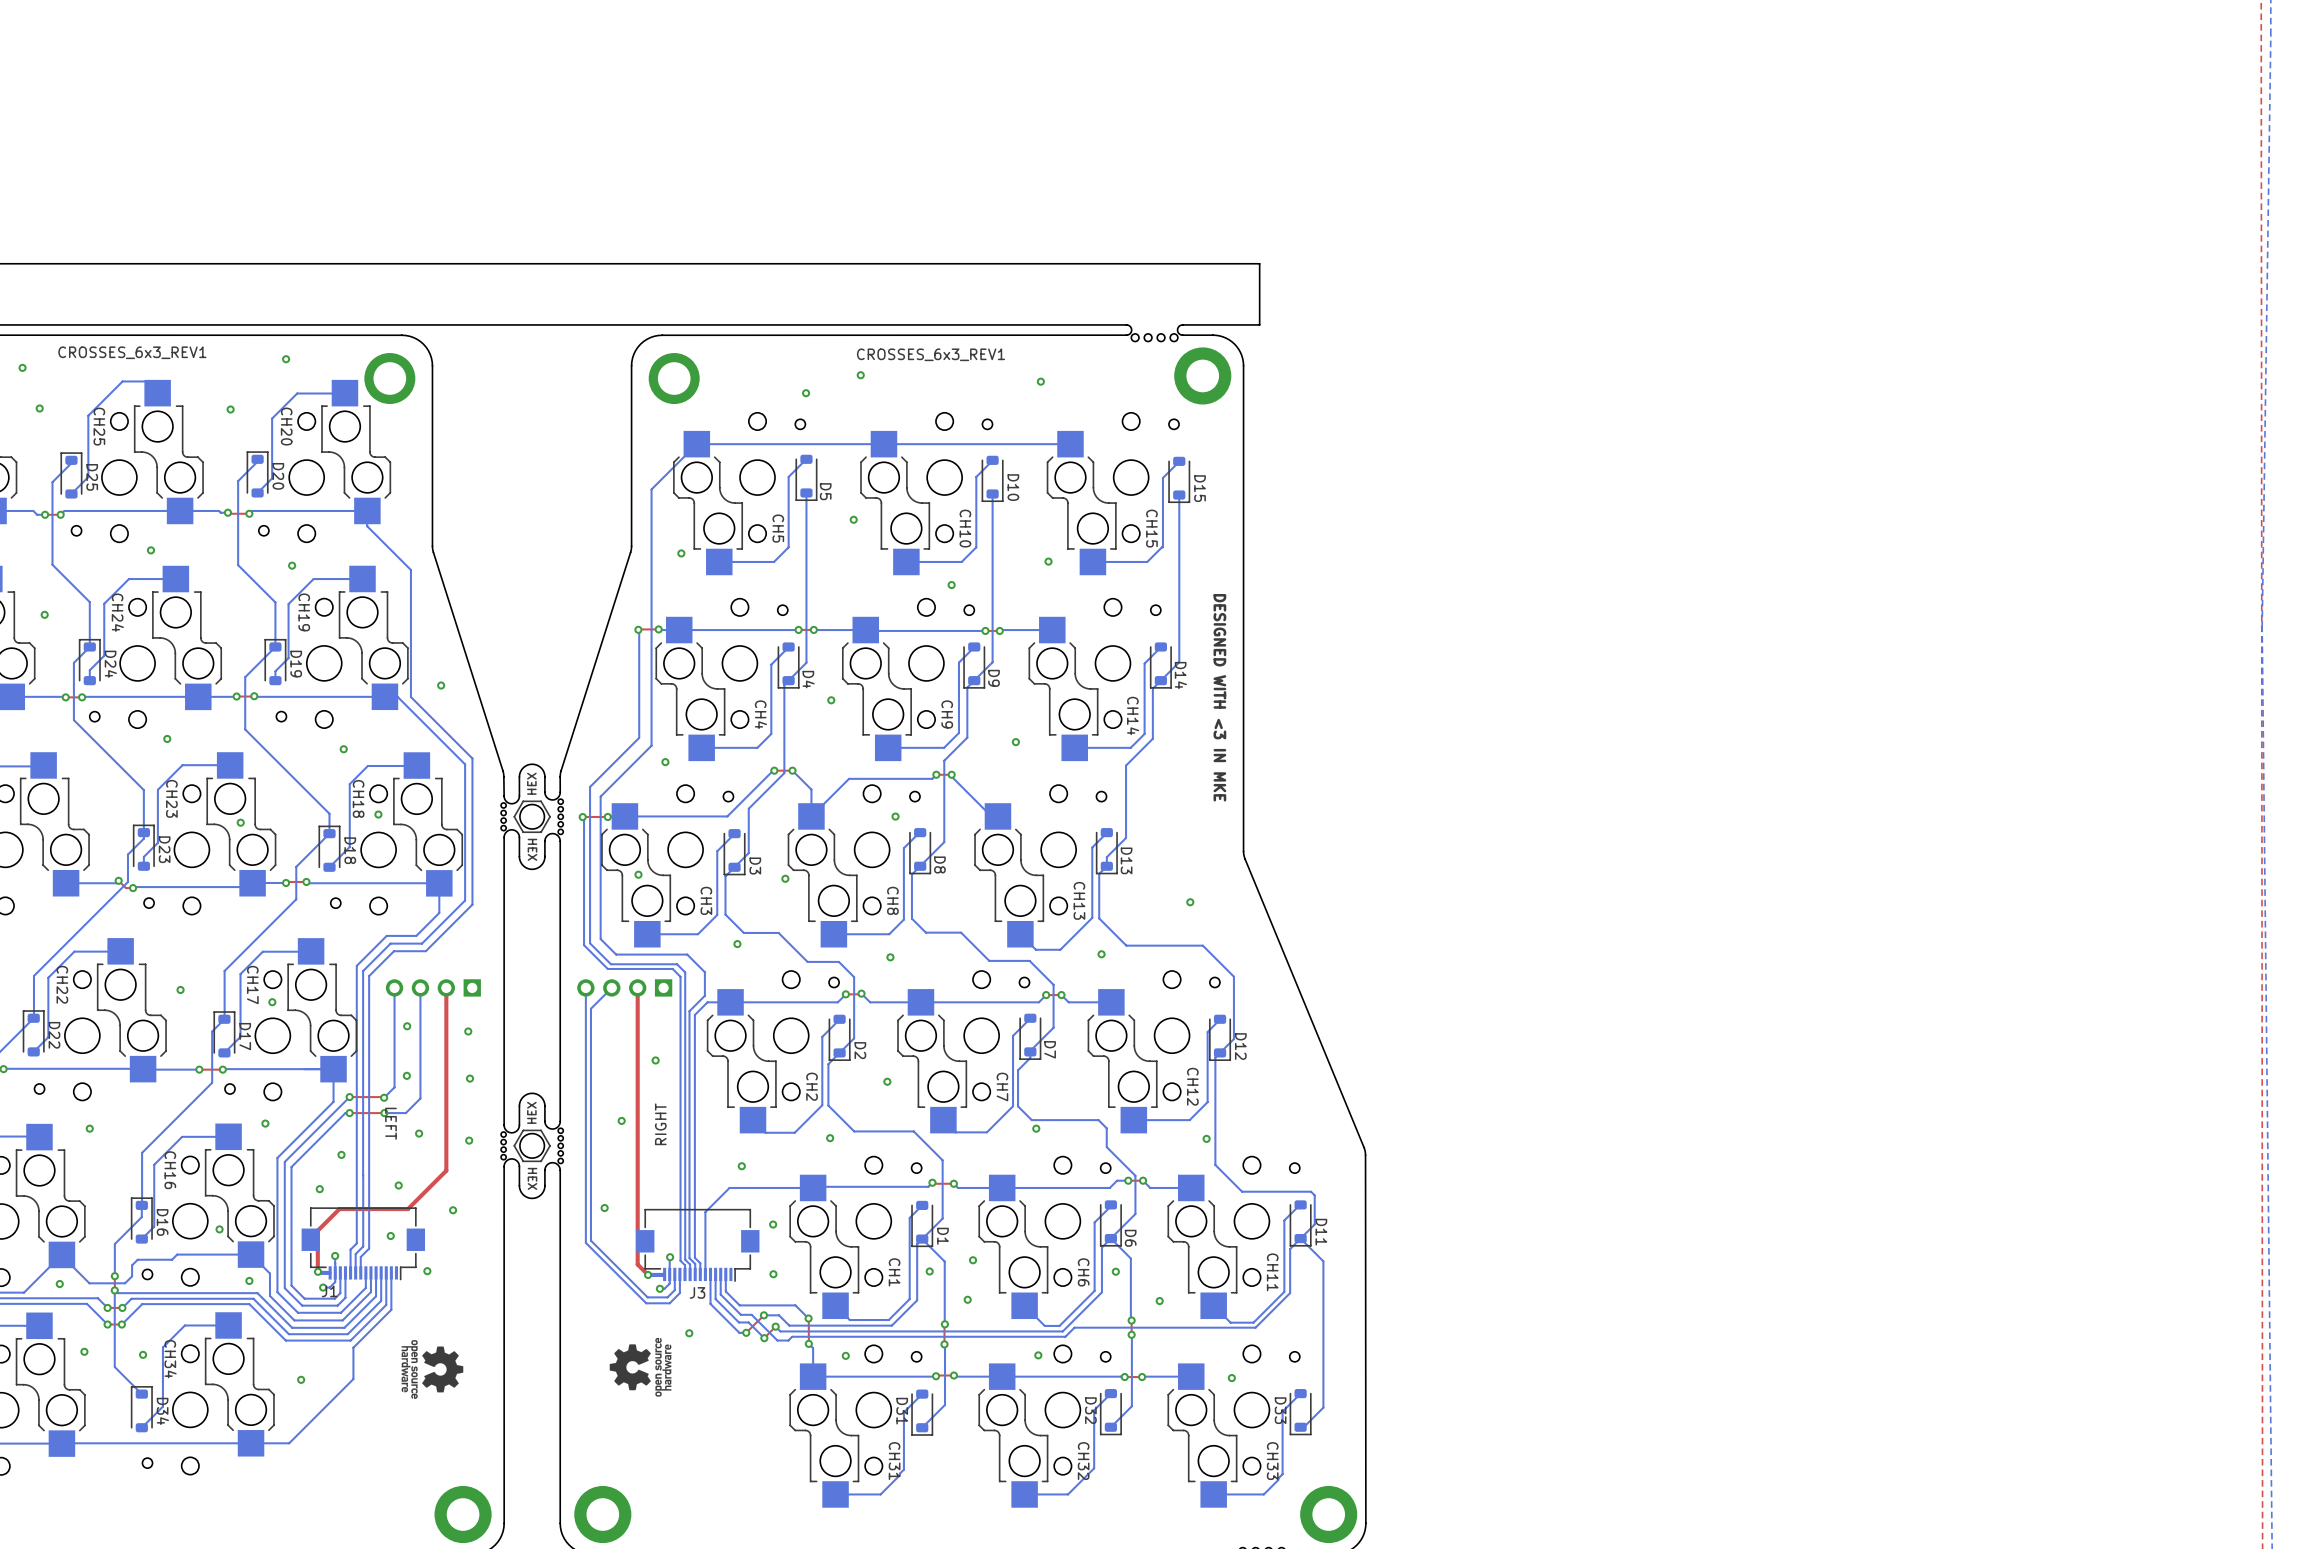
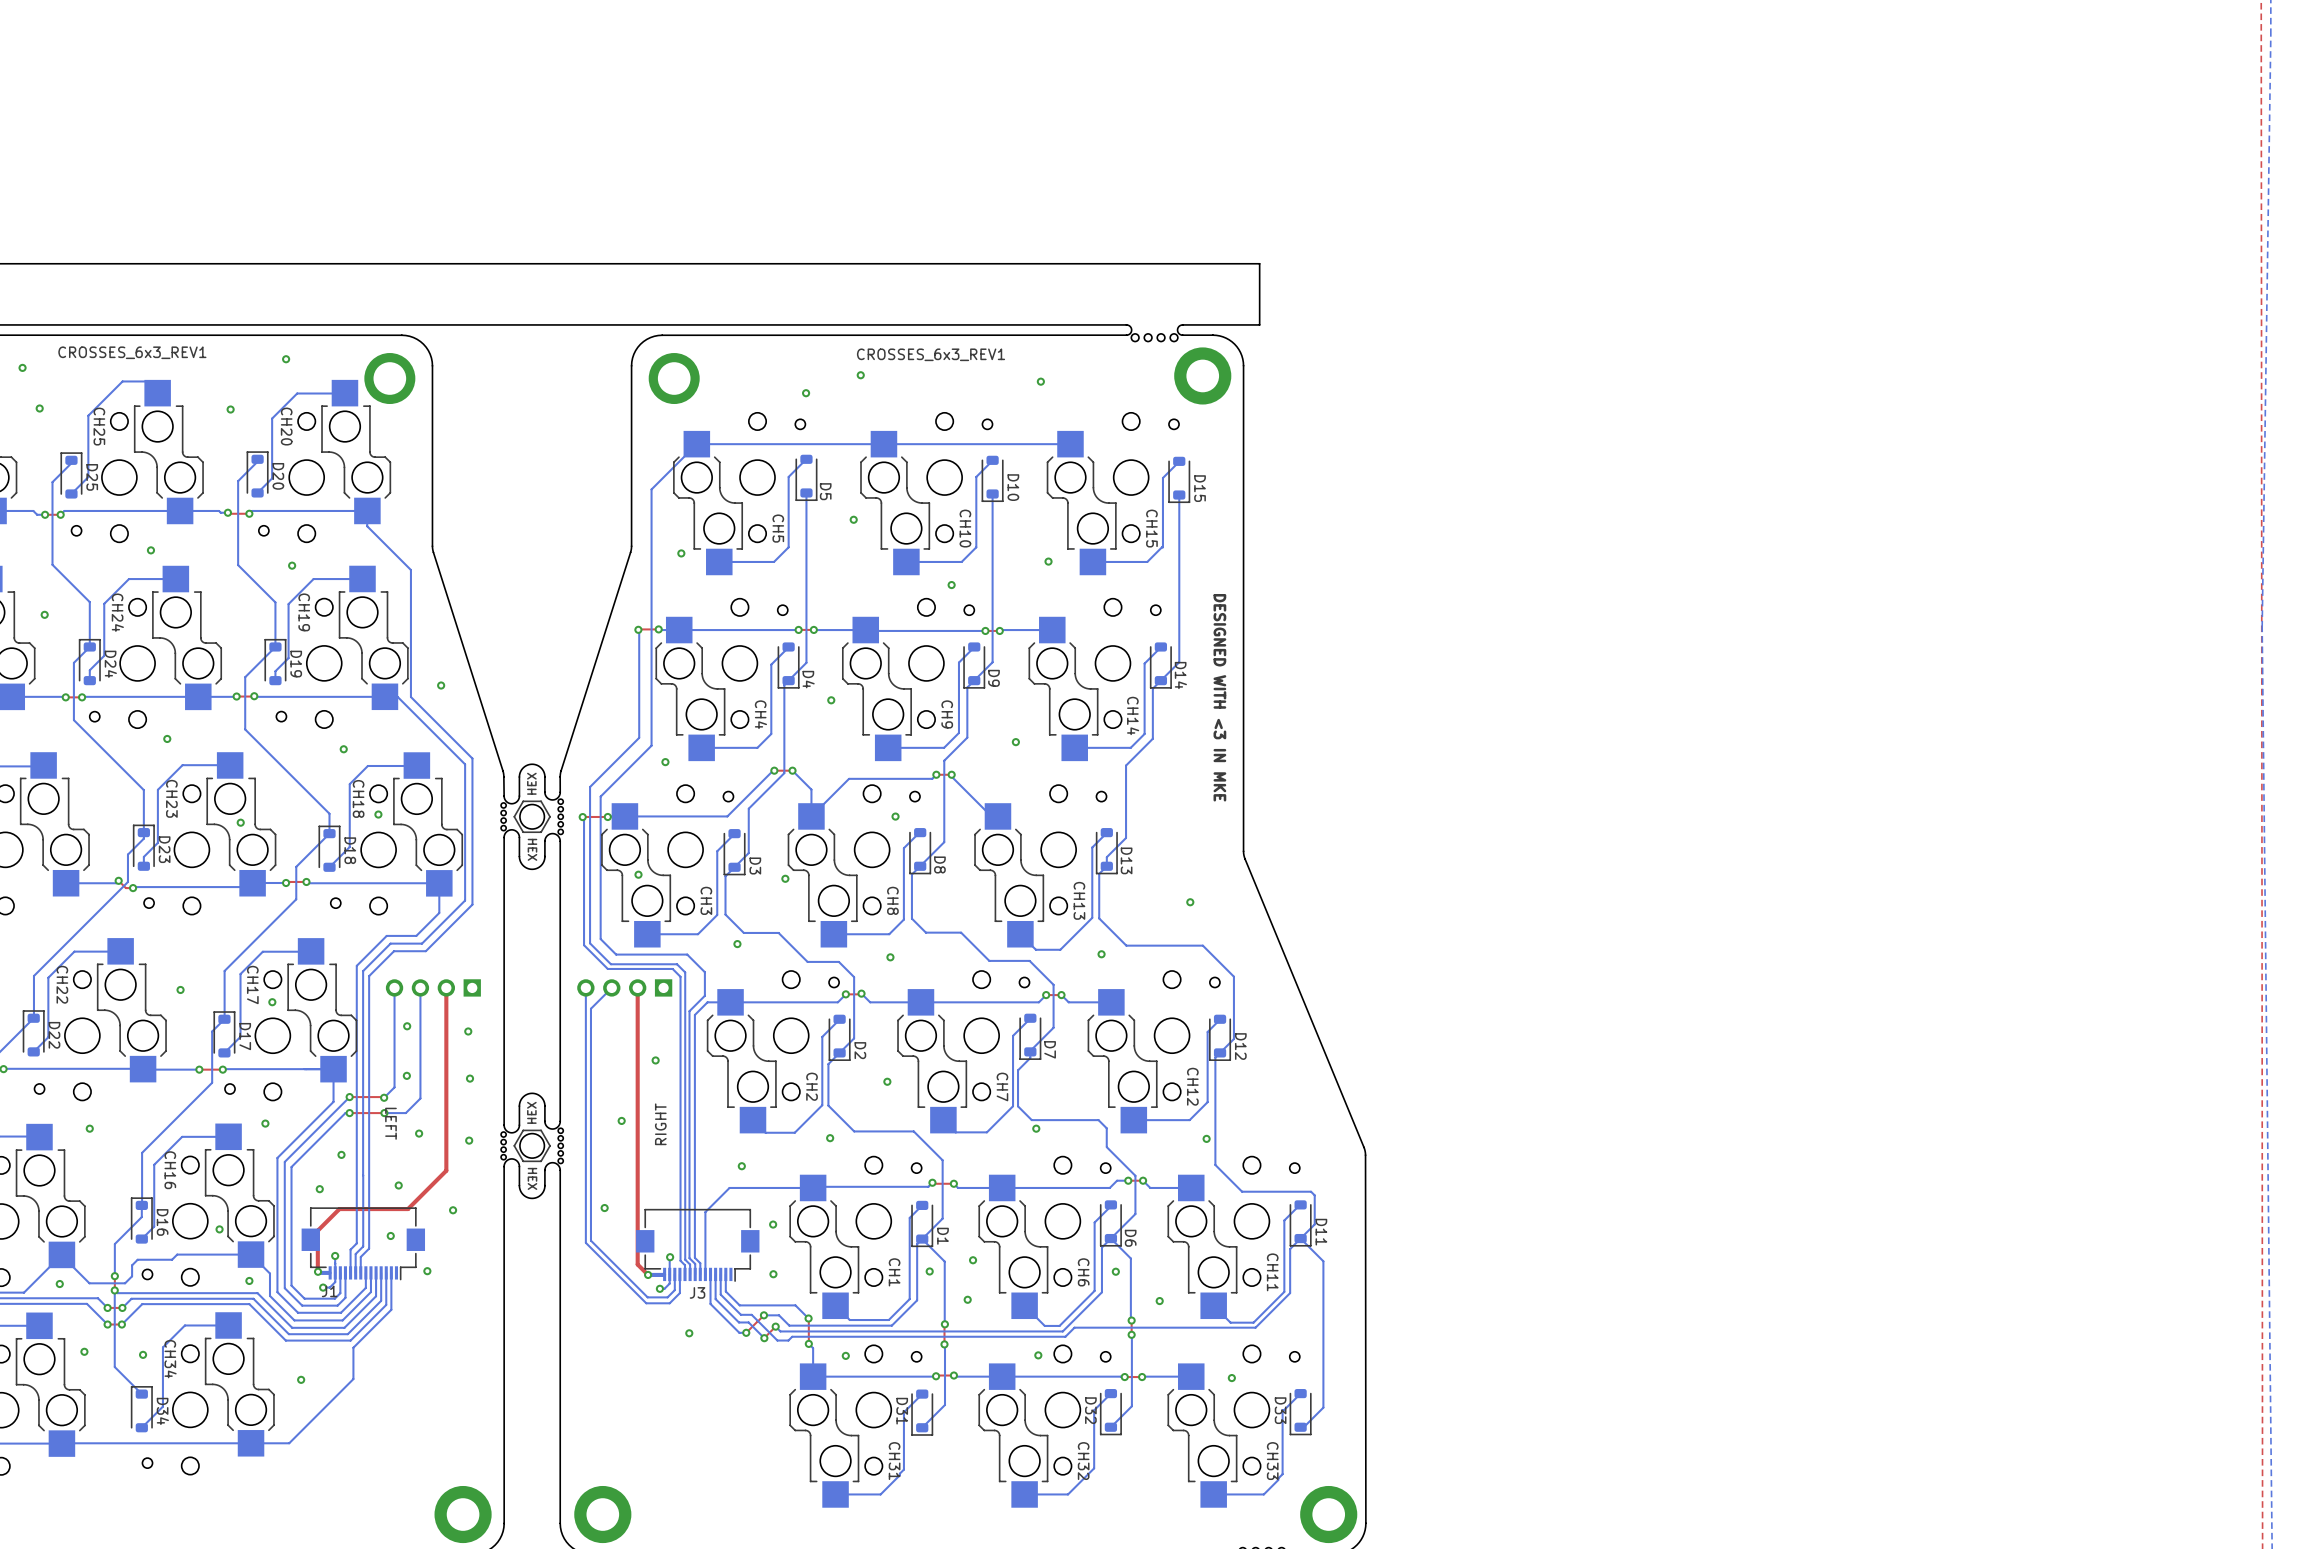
drawing: [609, 1337, 672, 1397] -> none
drawing: [401, 1340, 464, 1399] -> none

